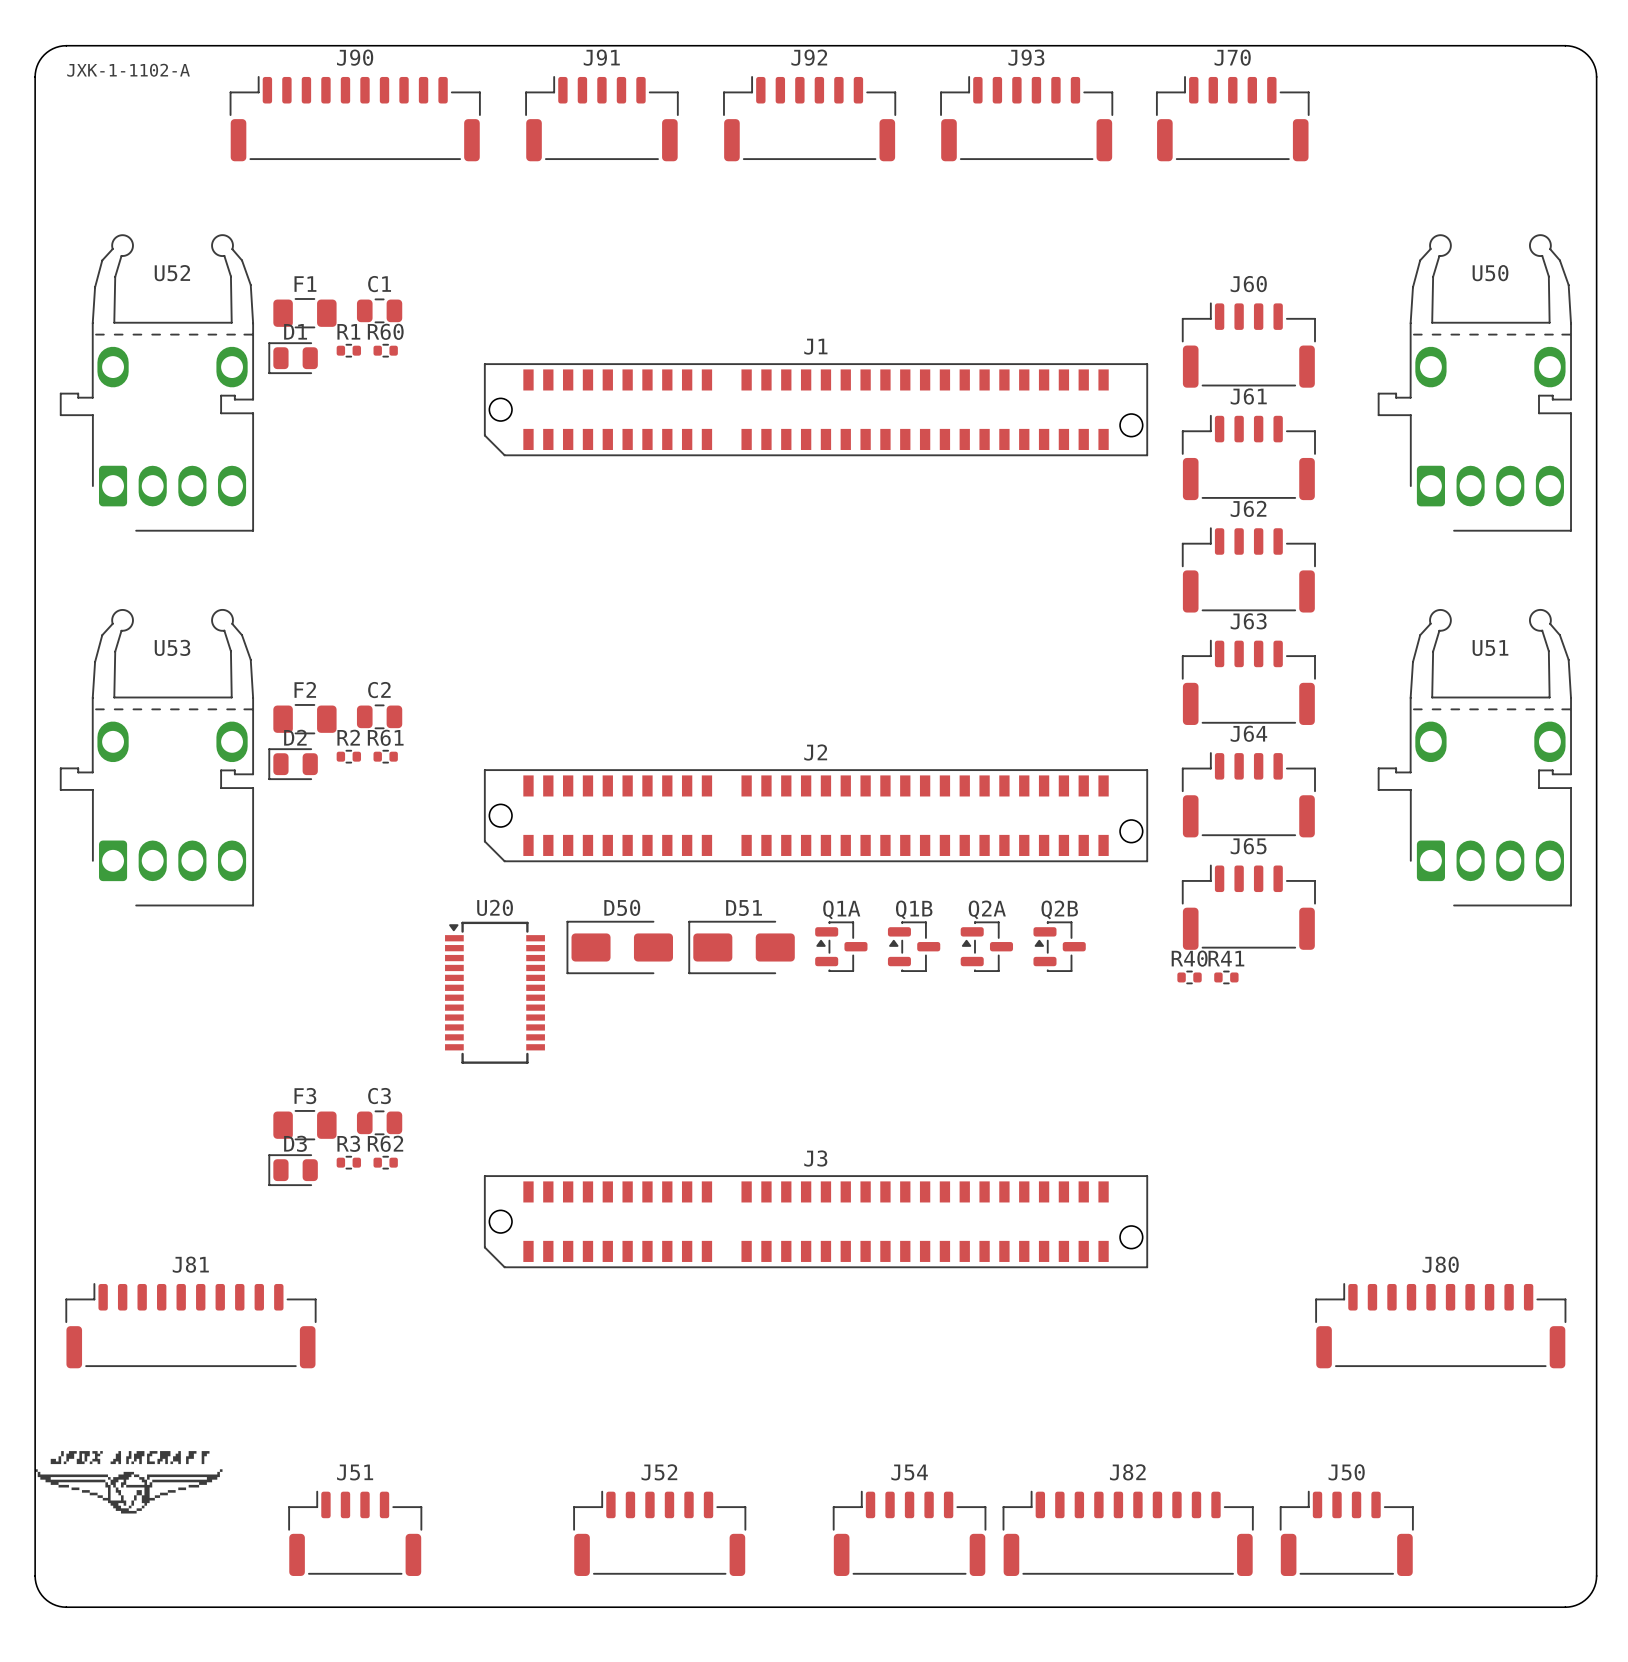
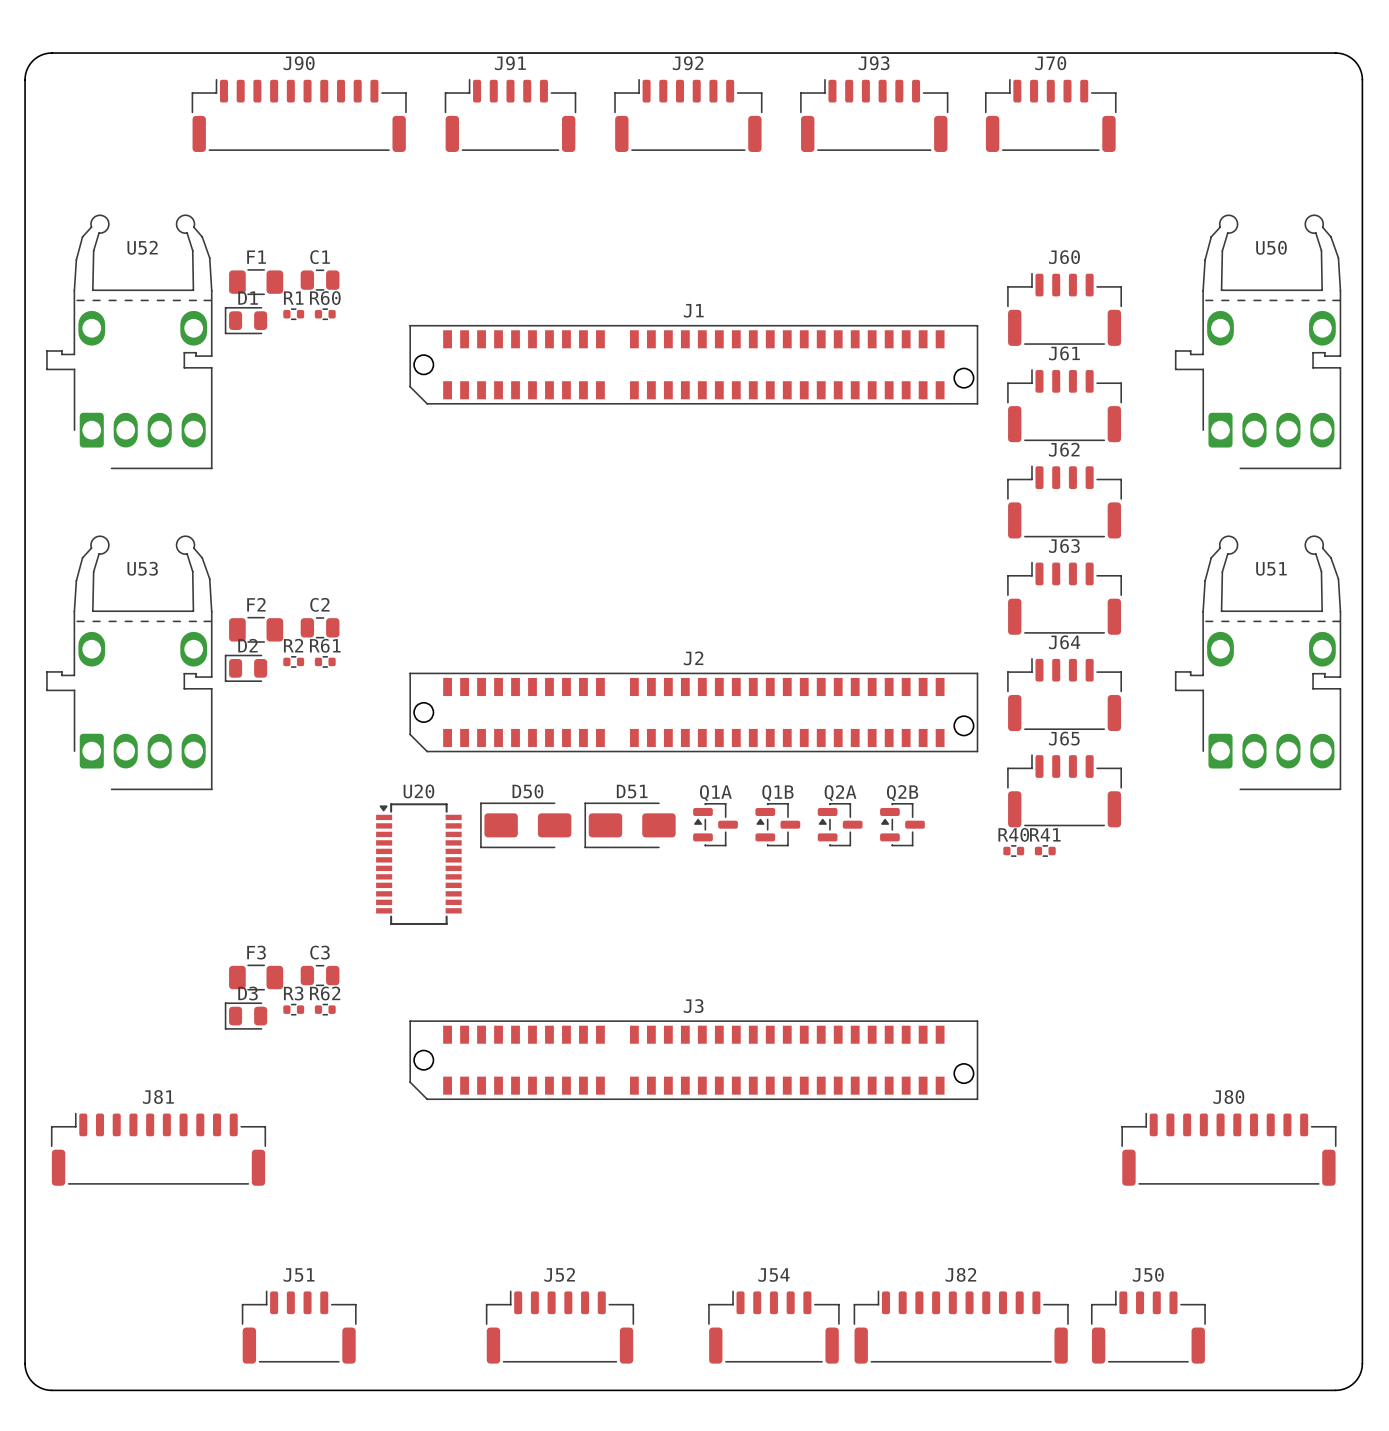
text: JXK-1-1102-A (128, 70) -> none
drawing: [35, 1451, 223, 1514] -> none

